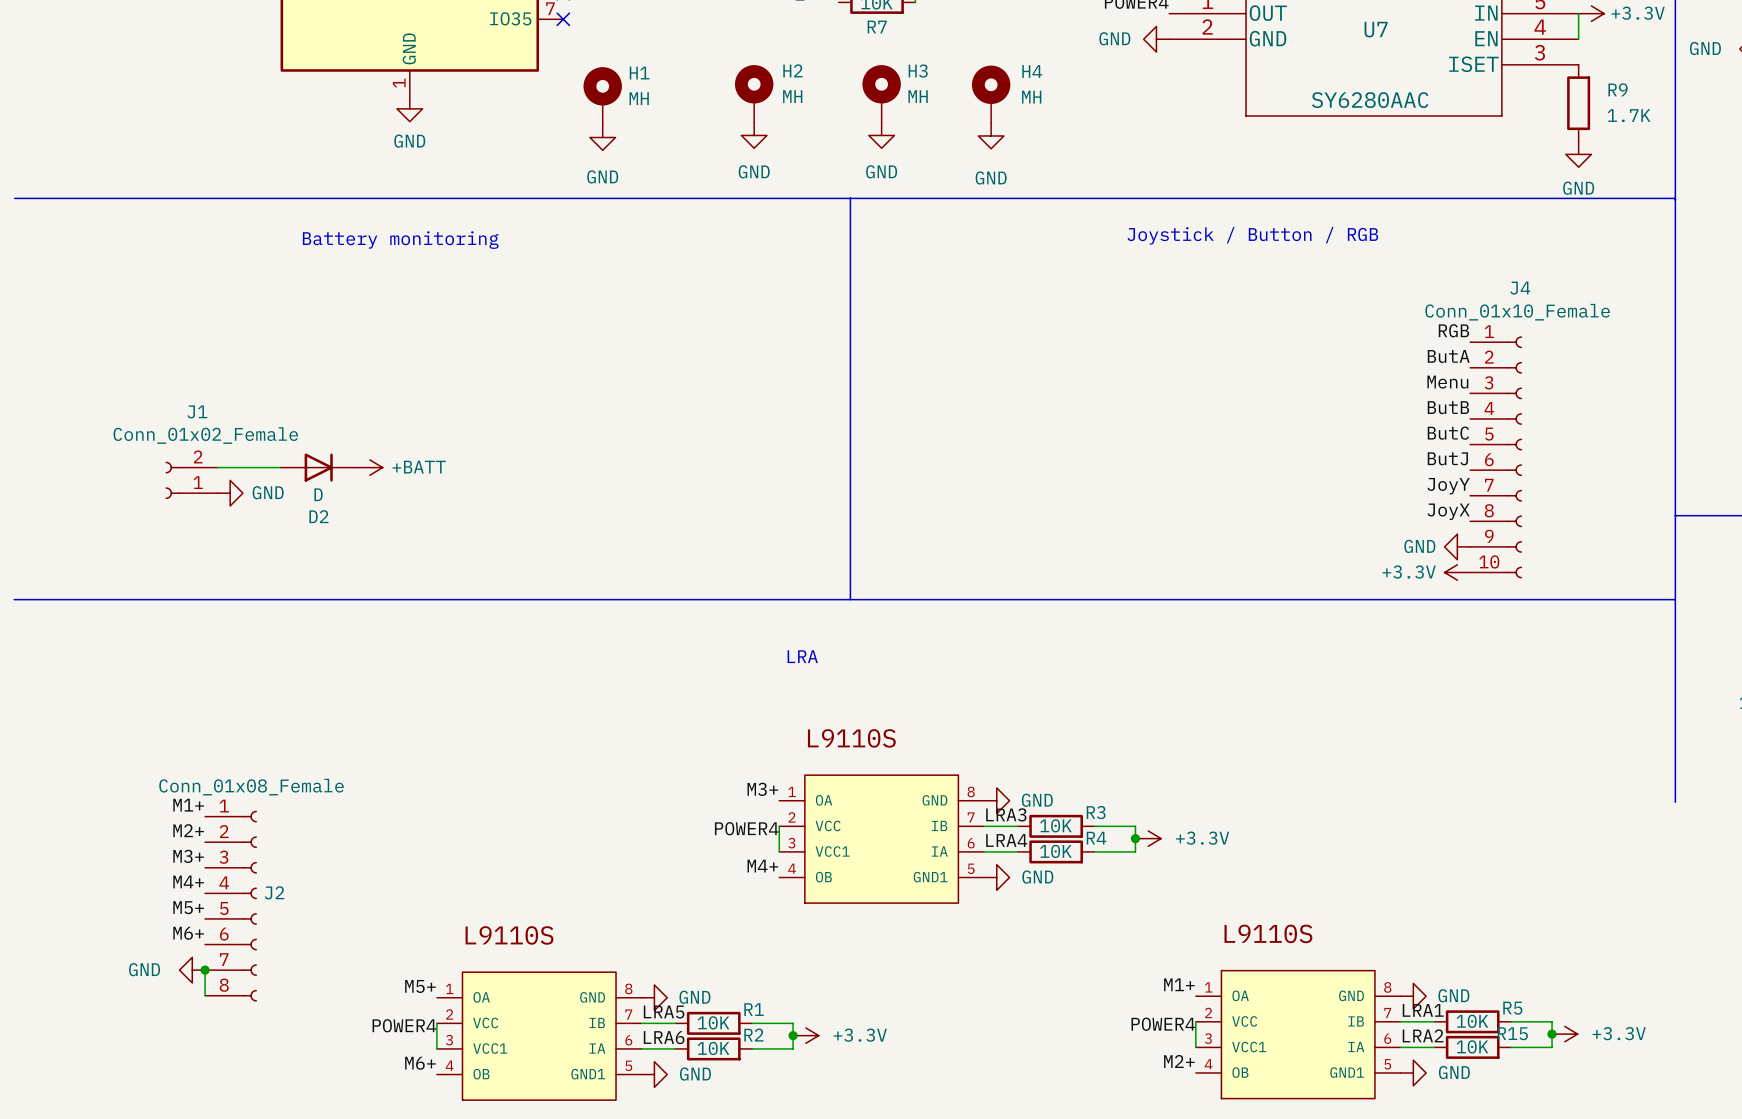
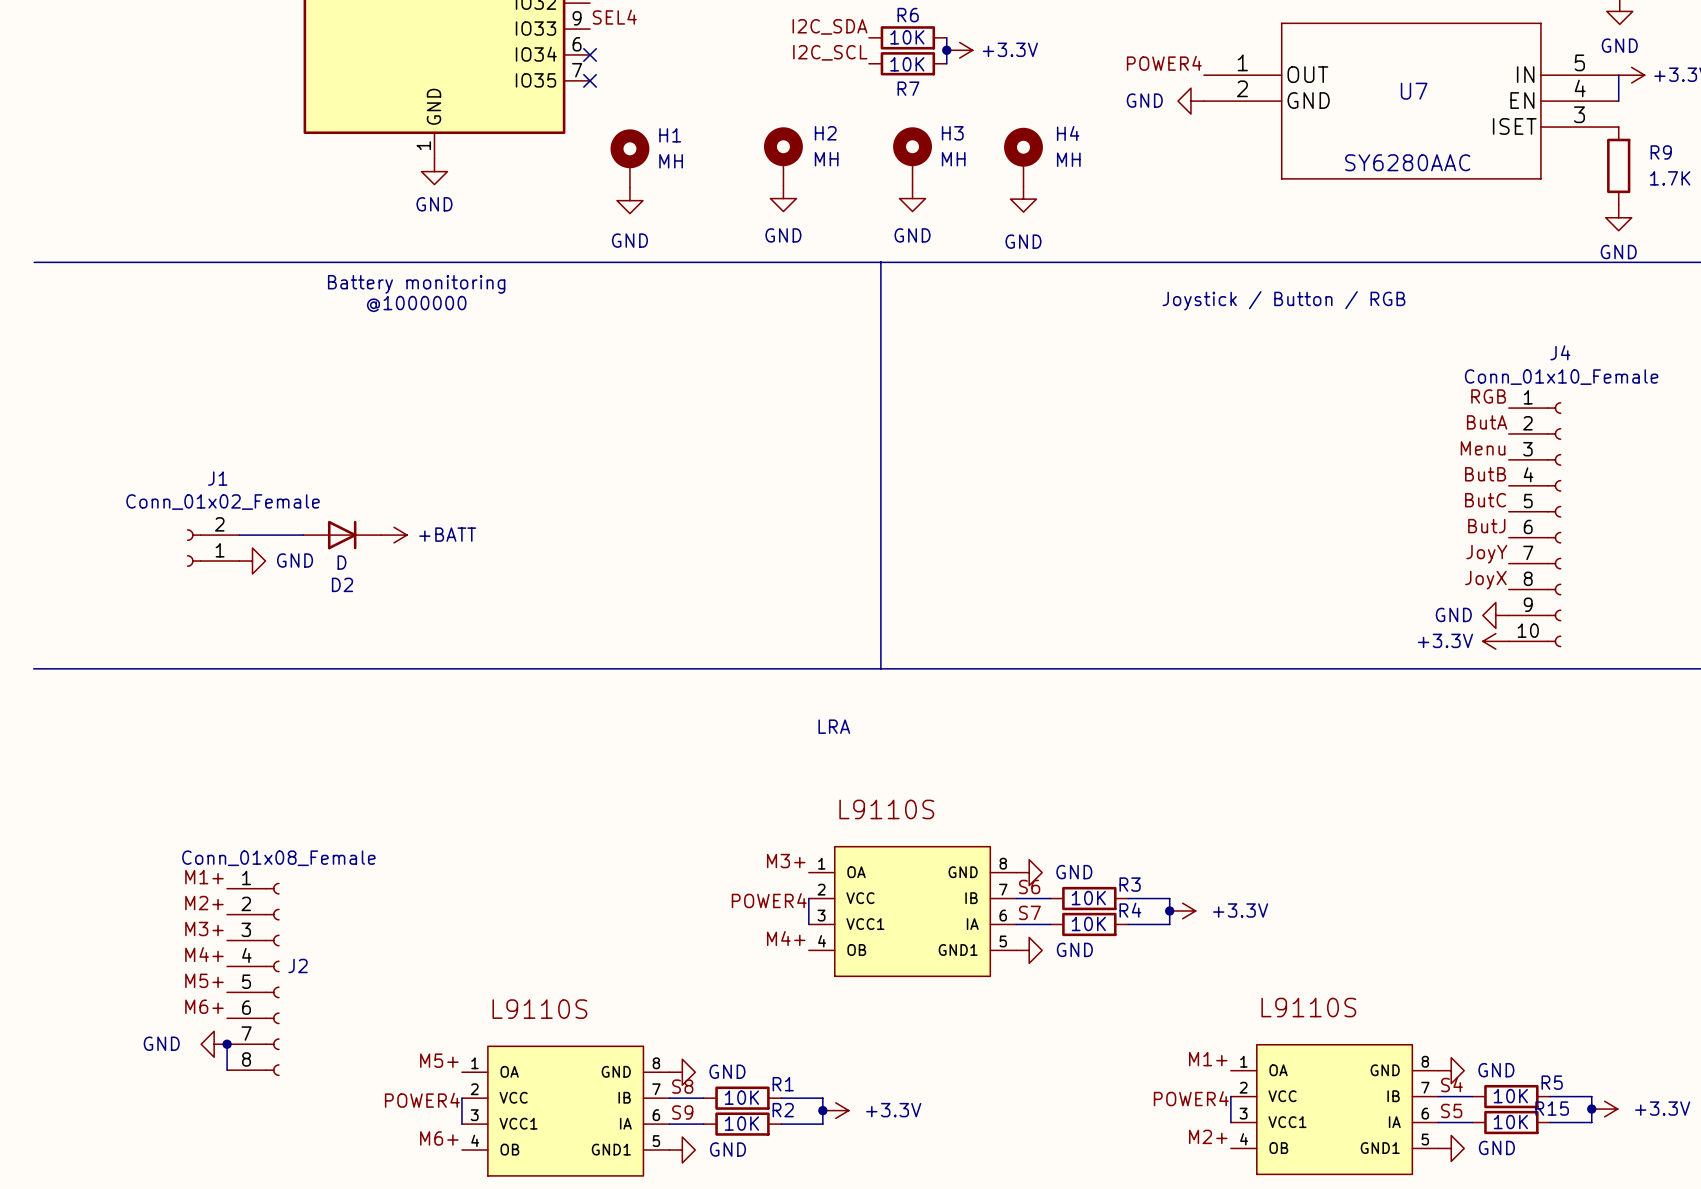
text: none -> Battery monitoring (416, 284)
text: Battery monitoring (400, 240) -> @1000000 (416, 303)
label: LRA3 (1006, 814) -> S6 (1029, 886)
label: LRA4 (1006, 840) -> S7 (1029, 912)
label: LRA1 (1423, 1010) -> S4 (1451, 1084)
label: LRA5 (664, 1012) -> S8 (682, 1086)
label: LRA2 (1423, 1035) -> S5 (1451, 1110)
label: LRA6 (664, 1037) -> S9 (682, 1112)

